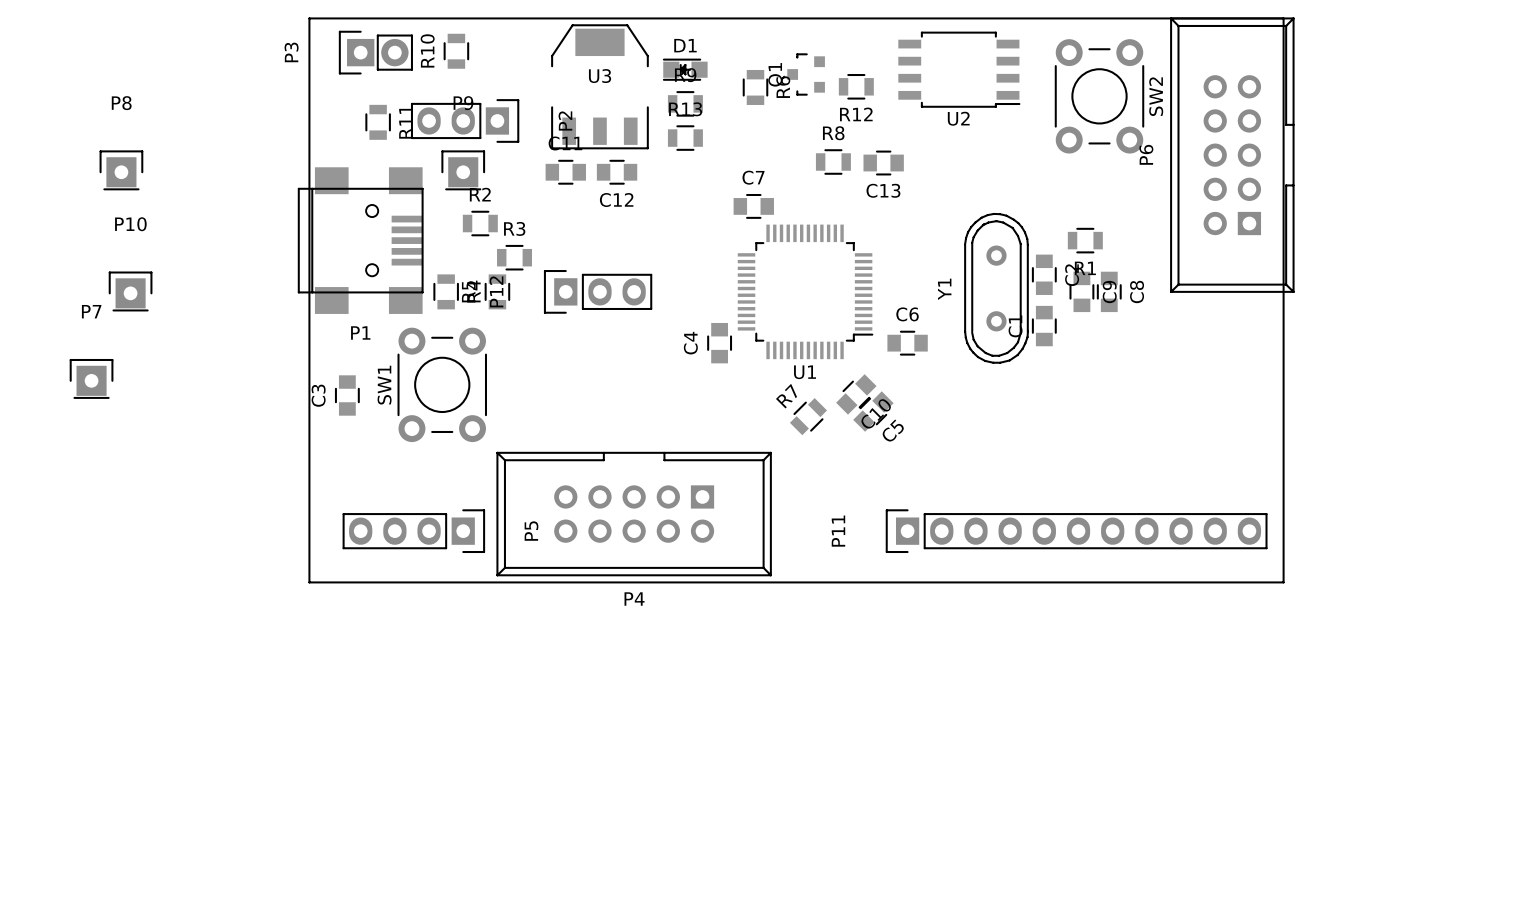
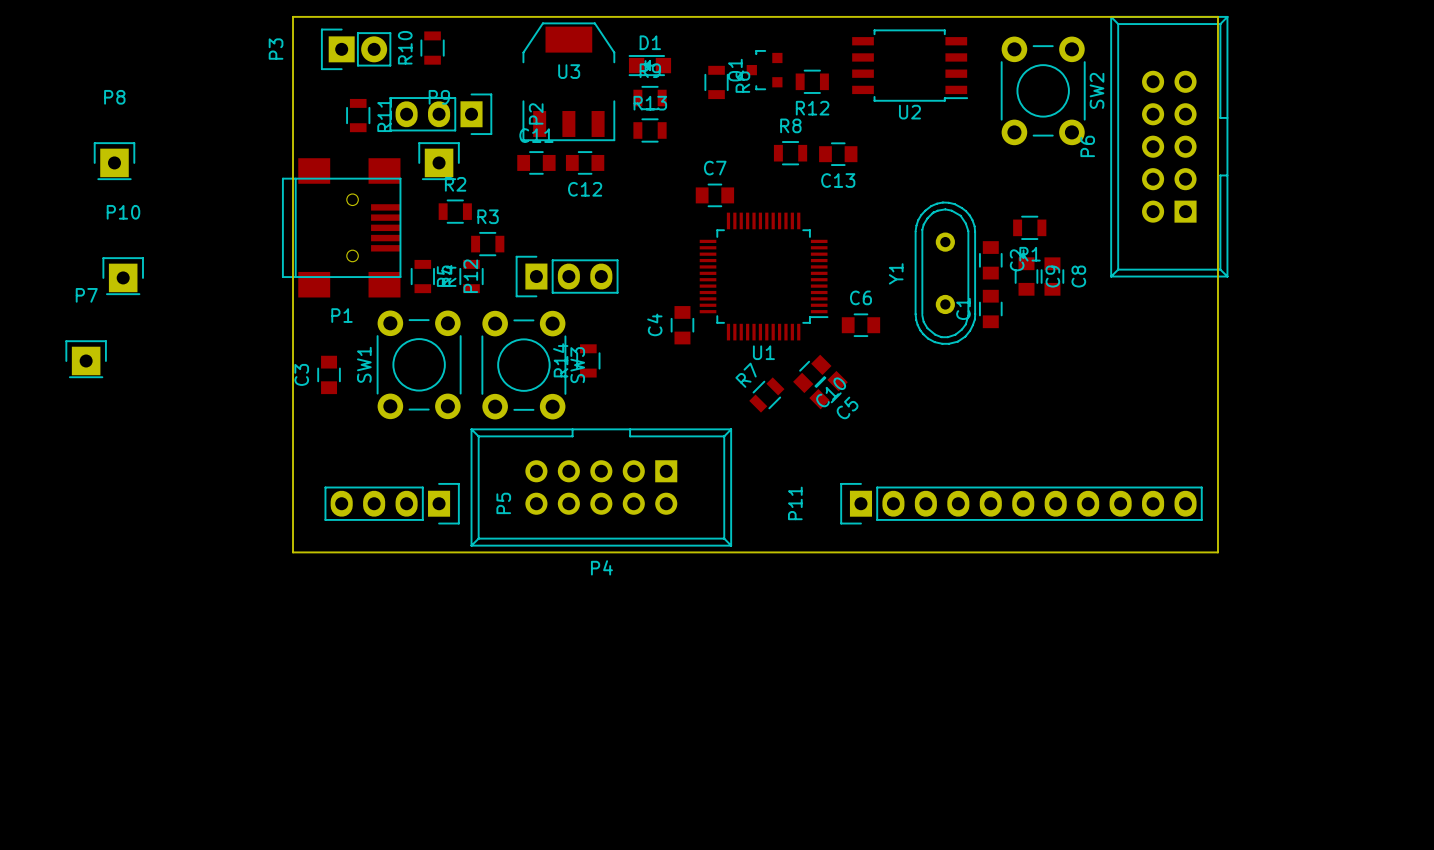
R14: none -> (588, 360)
SW3: none -> (523, 365)

